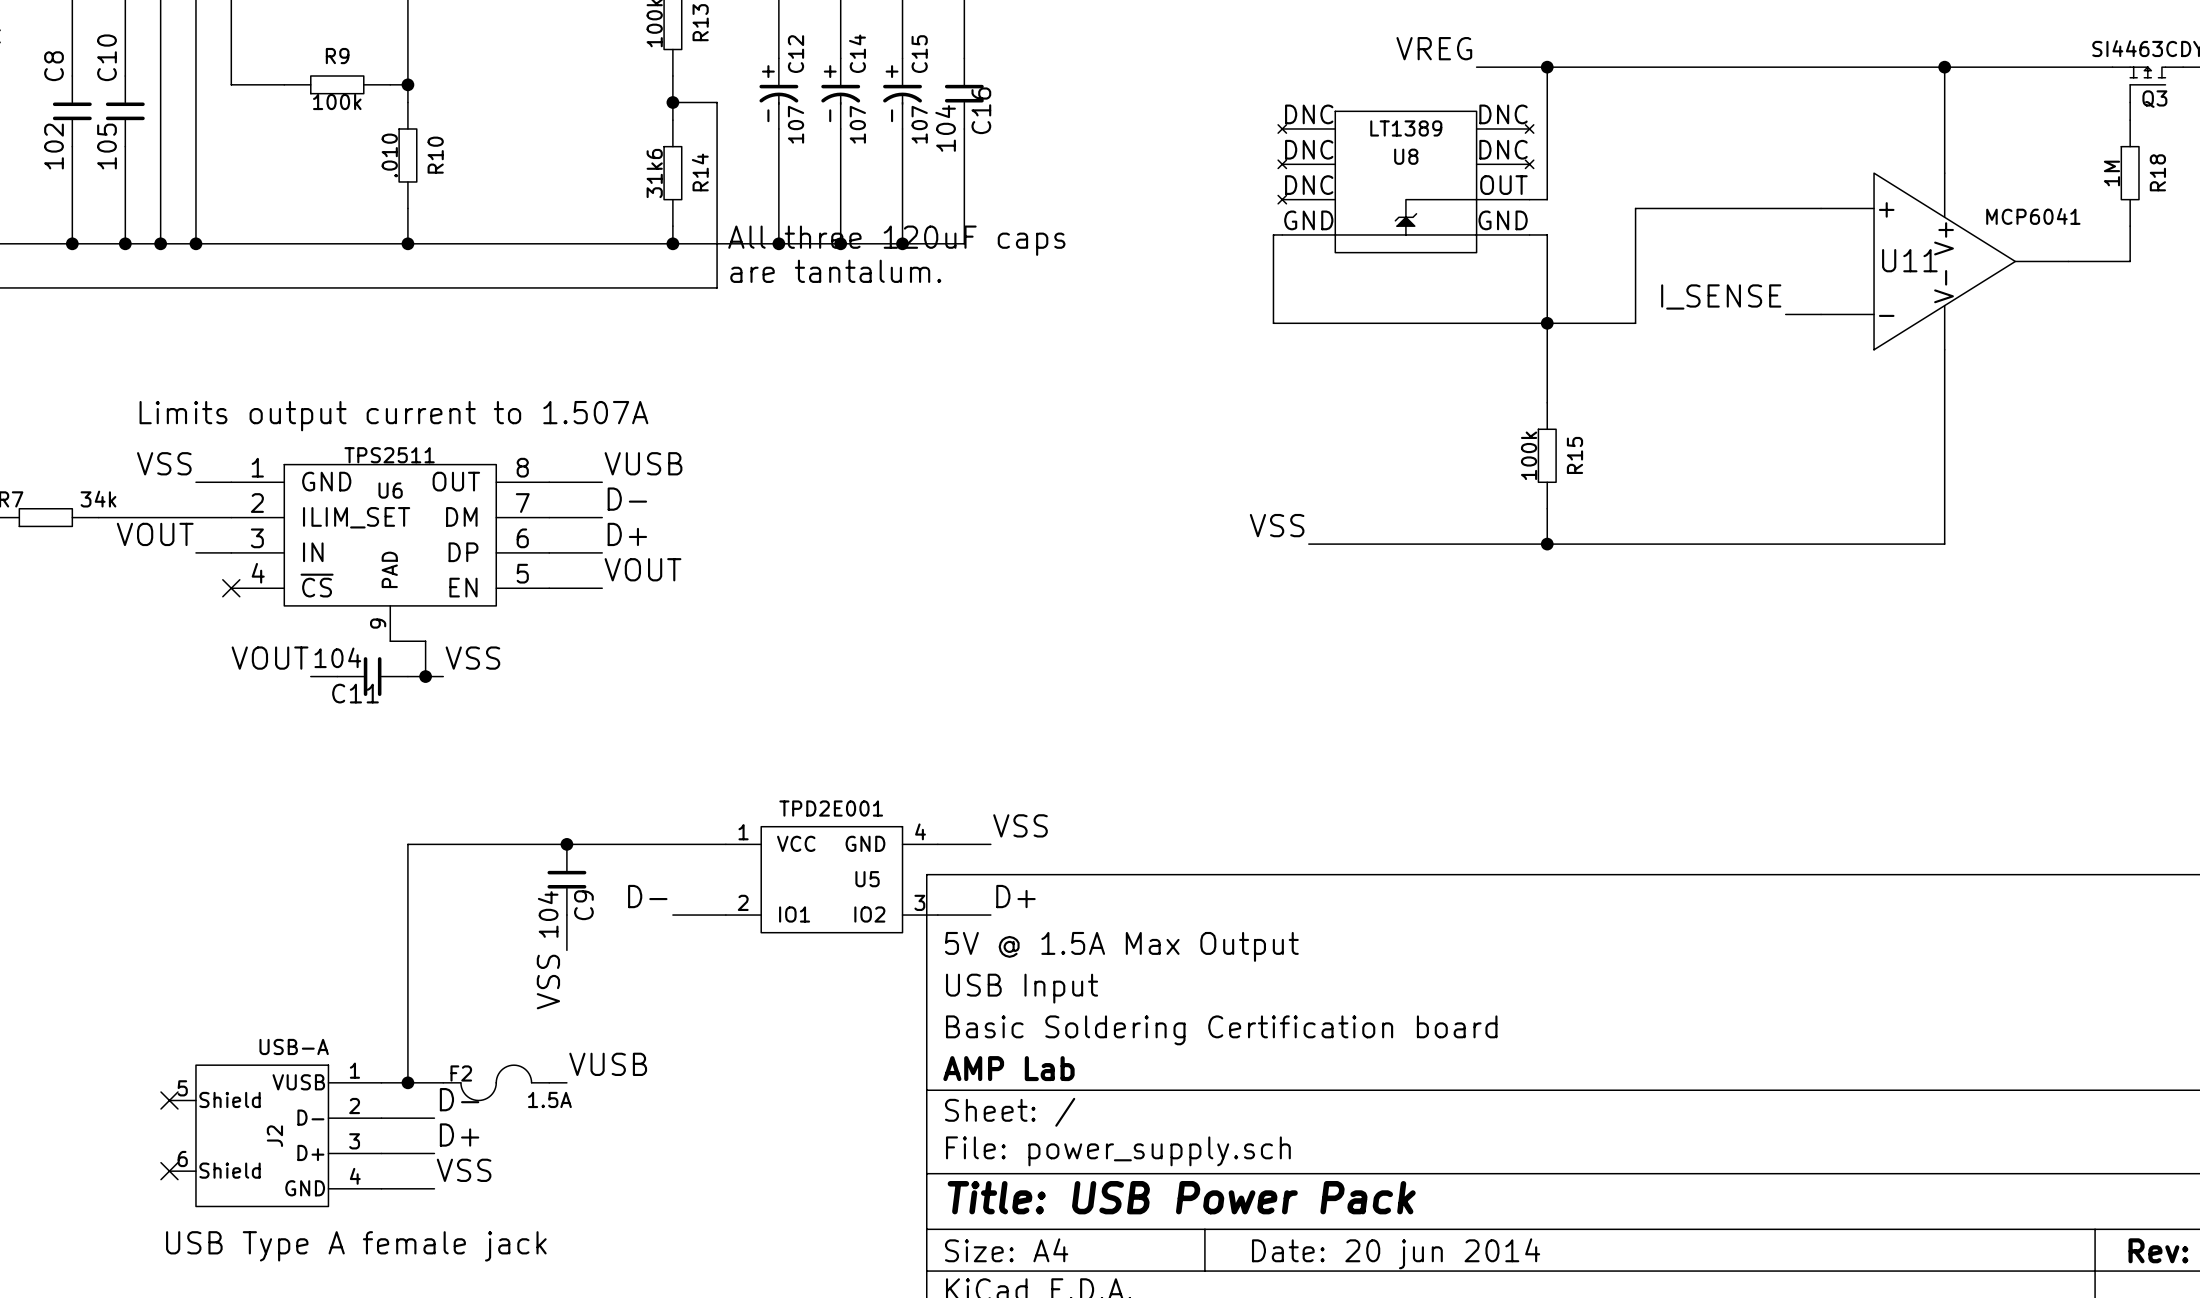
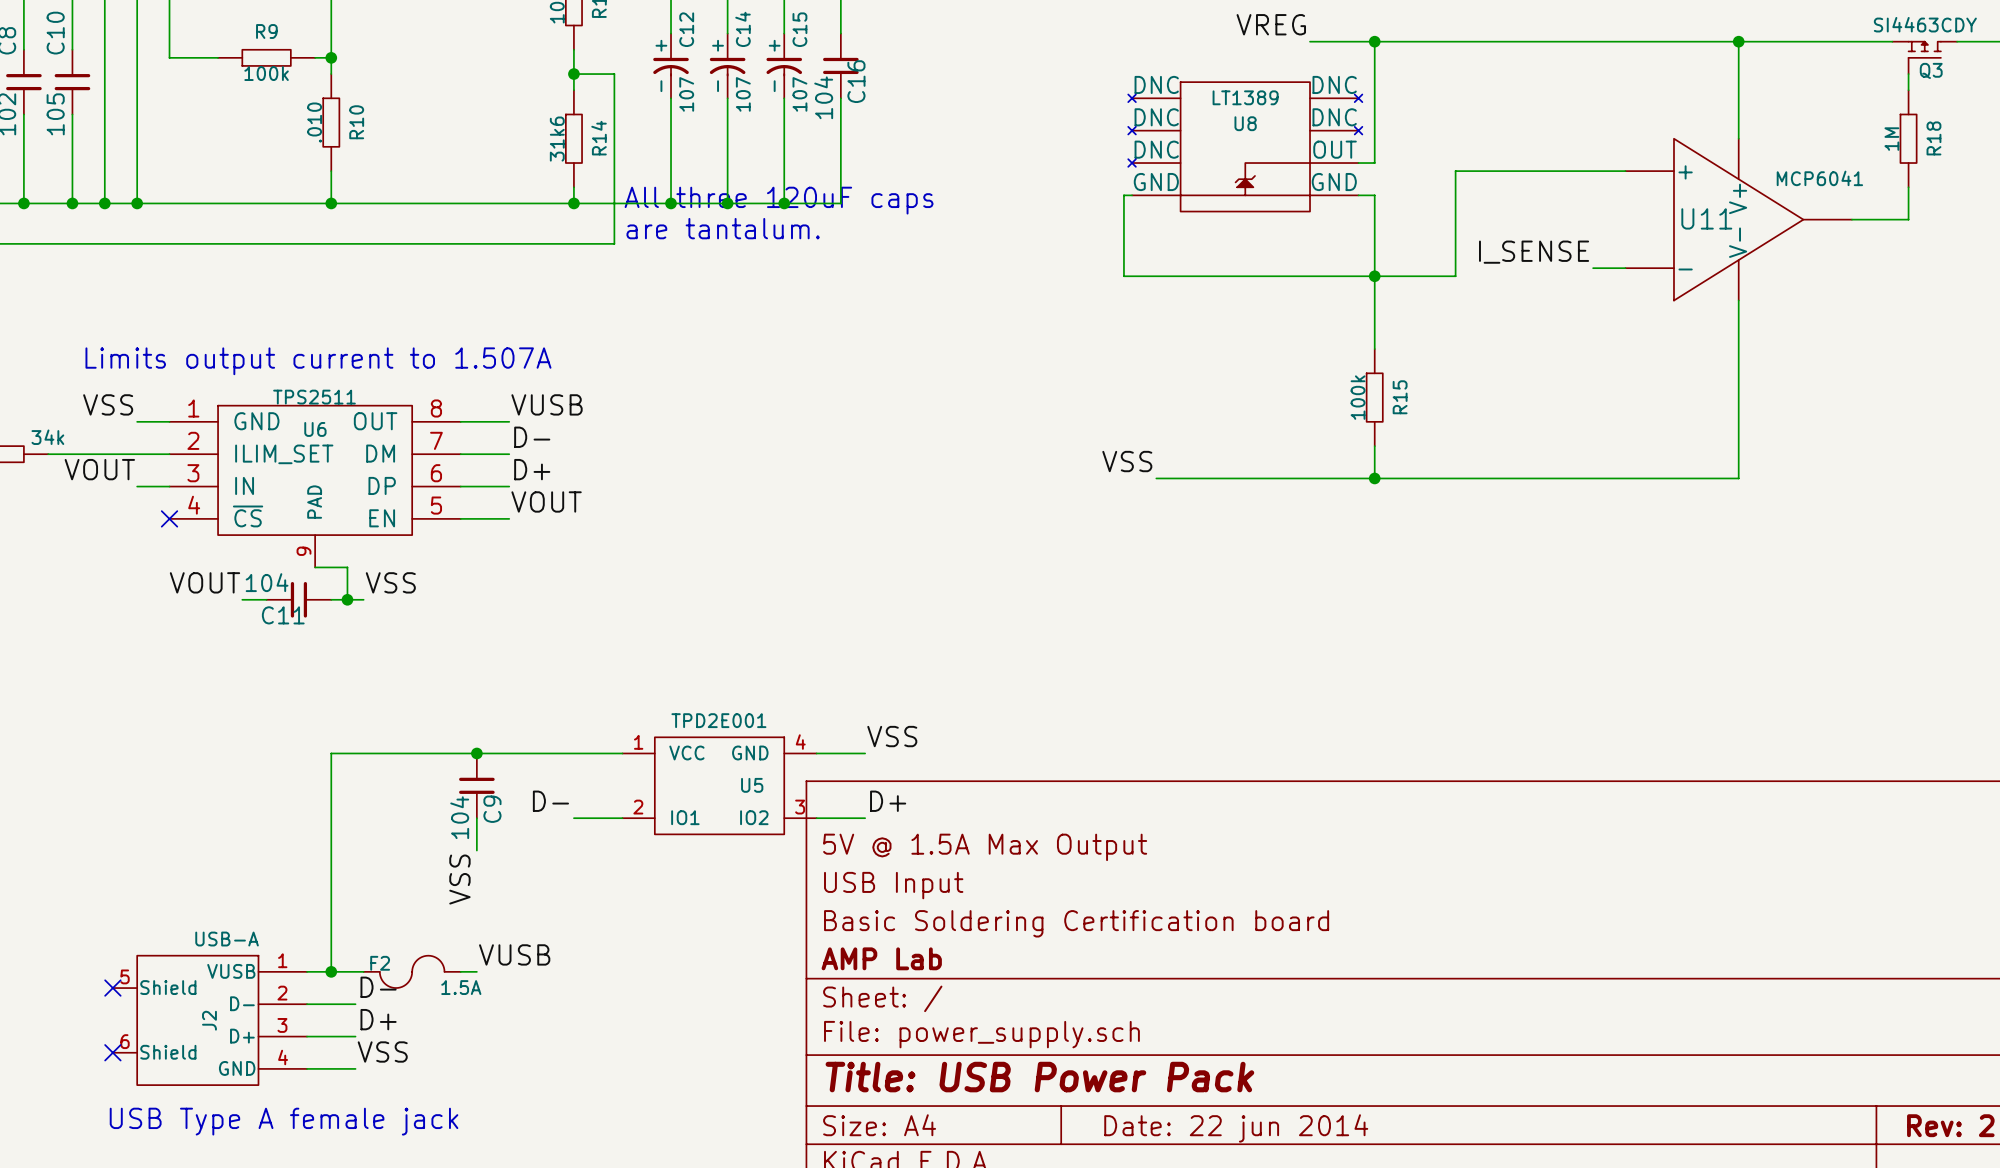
title block: Date: 20 jun 2014 (1396, 1253) -> Date: 22 jun 2014 (1236, 1128)

